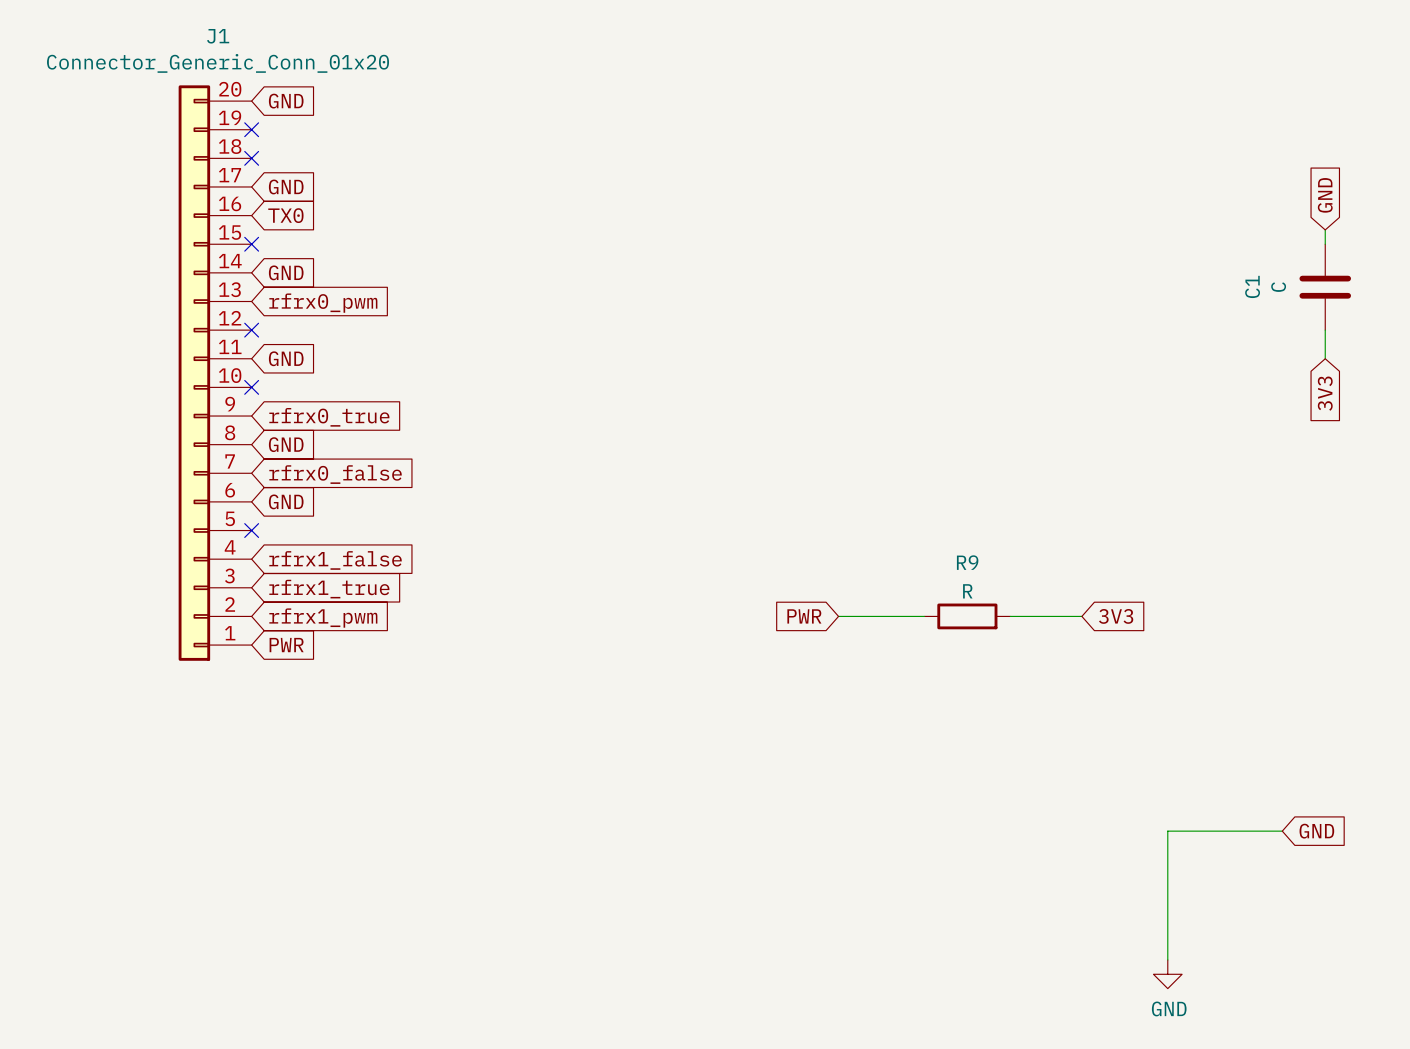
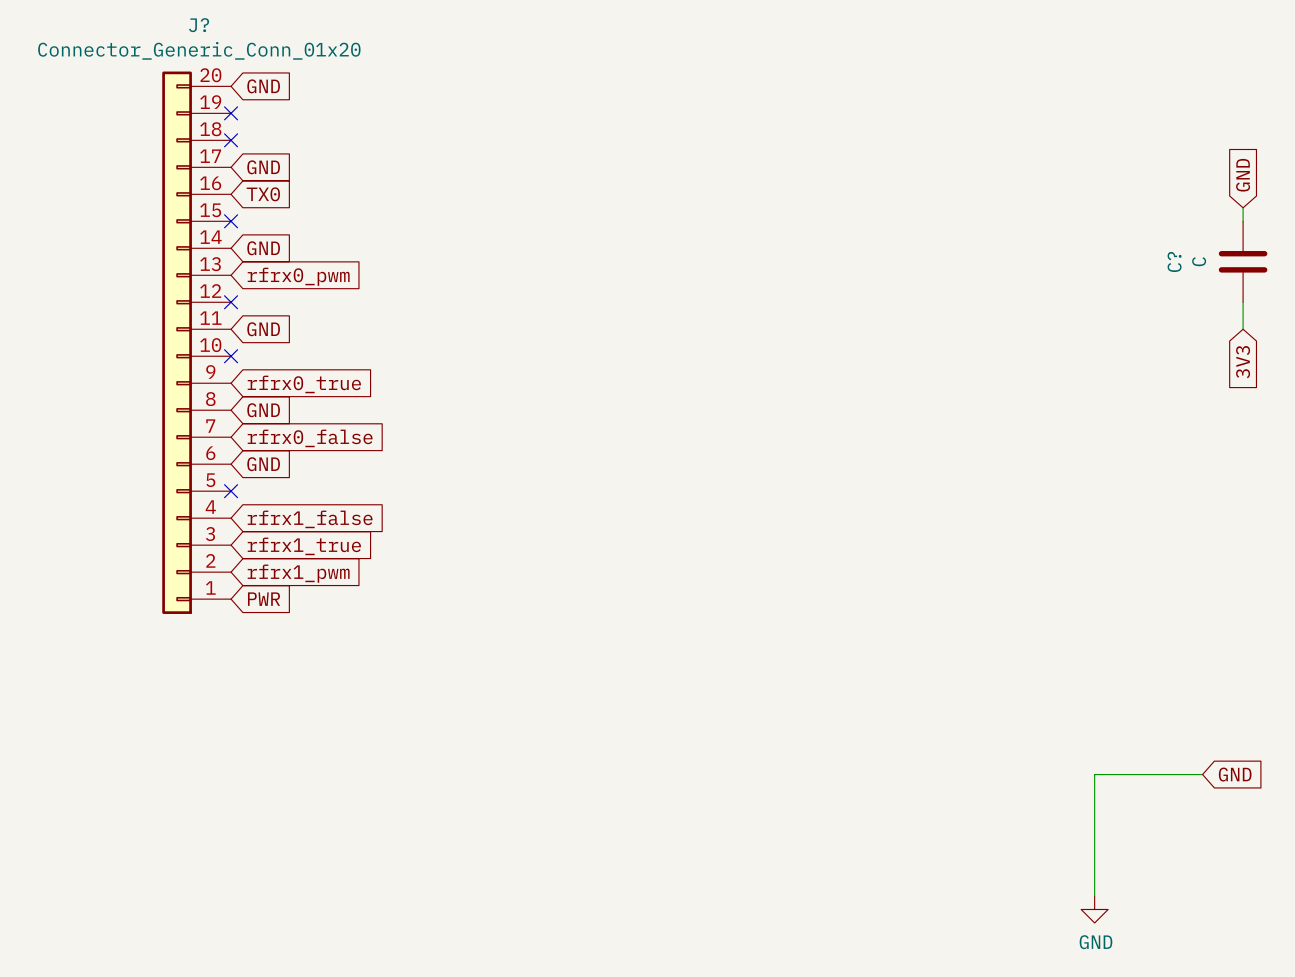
J1 name: J1 (218, 36) -> J? (199, 25)
C1 name: C1 (1252, 286) -> C? (1174, 261)
global label: PWR (804, 616) -> none
wire: (838, 616) (924, 616) -> none
R9: R (967, 616) -> none
wire: (1010, 616) (1081, 616) -> none
global label: 3V3 (1116, 616) -> none

